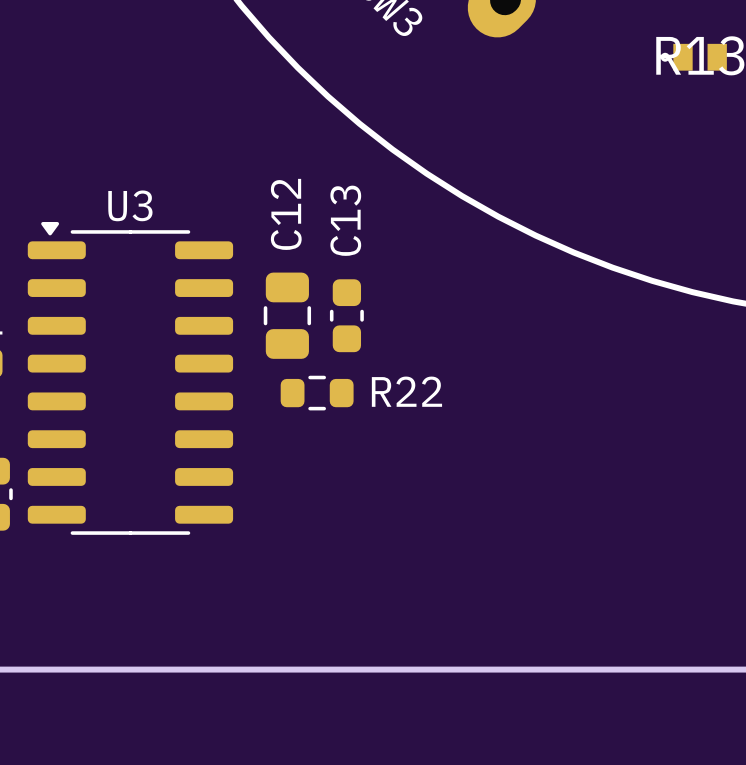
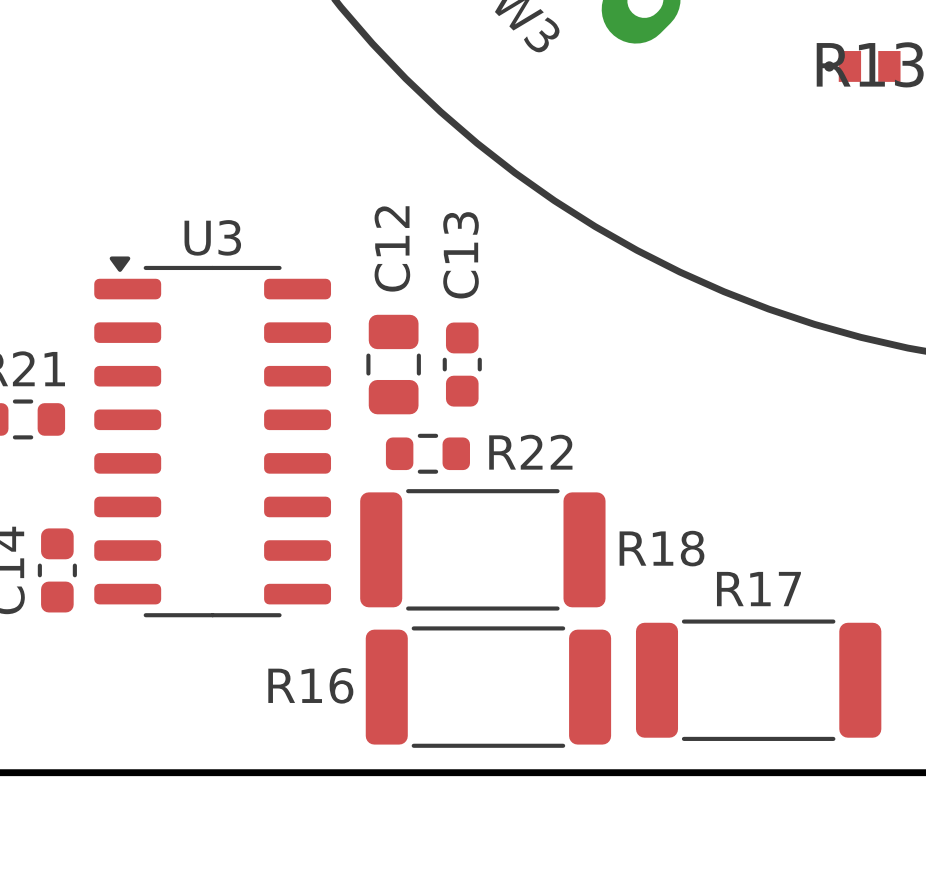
R18: none -> (482, 549)
R17: none -> (758, 680)
R16: none -> (488, 687)

